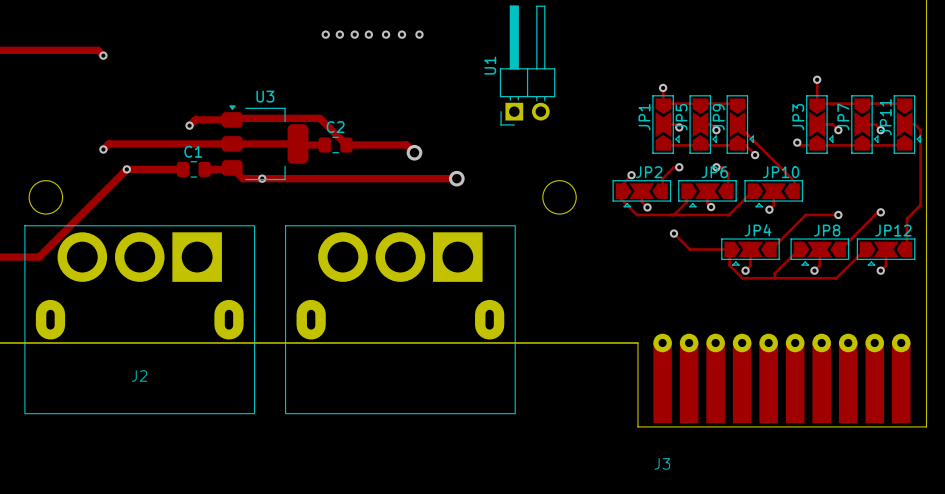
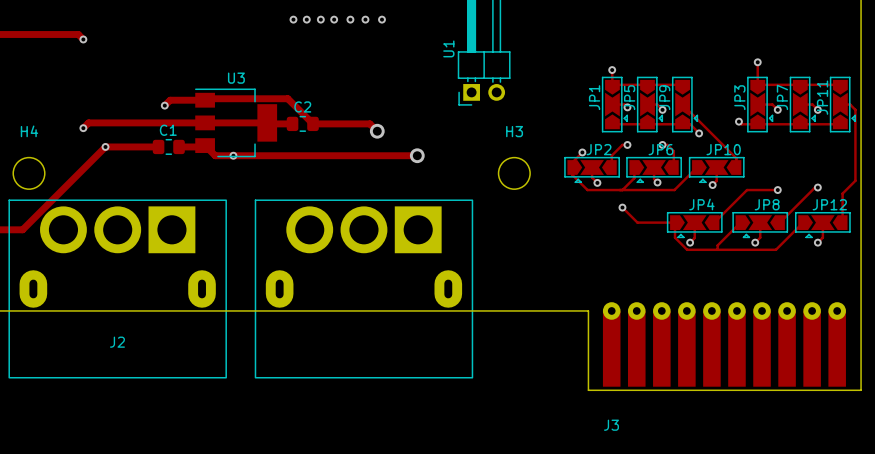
U3 footprint: [221, 105, 309, 181] -> [195, 88, 278, 158]
H4 name: none -> H4 (29, 131)
H3 name: none -> H3 (514, 131)

